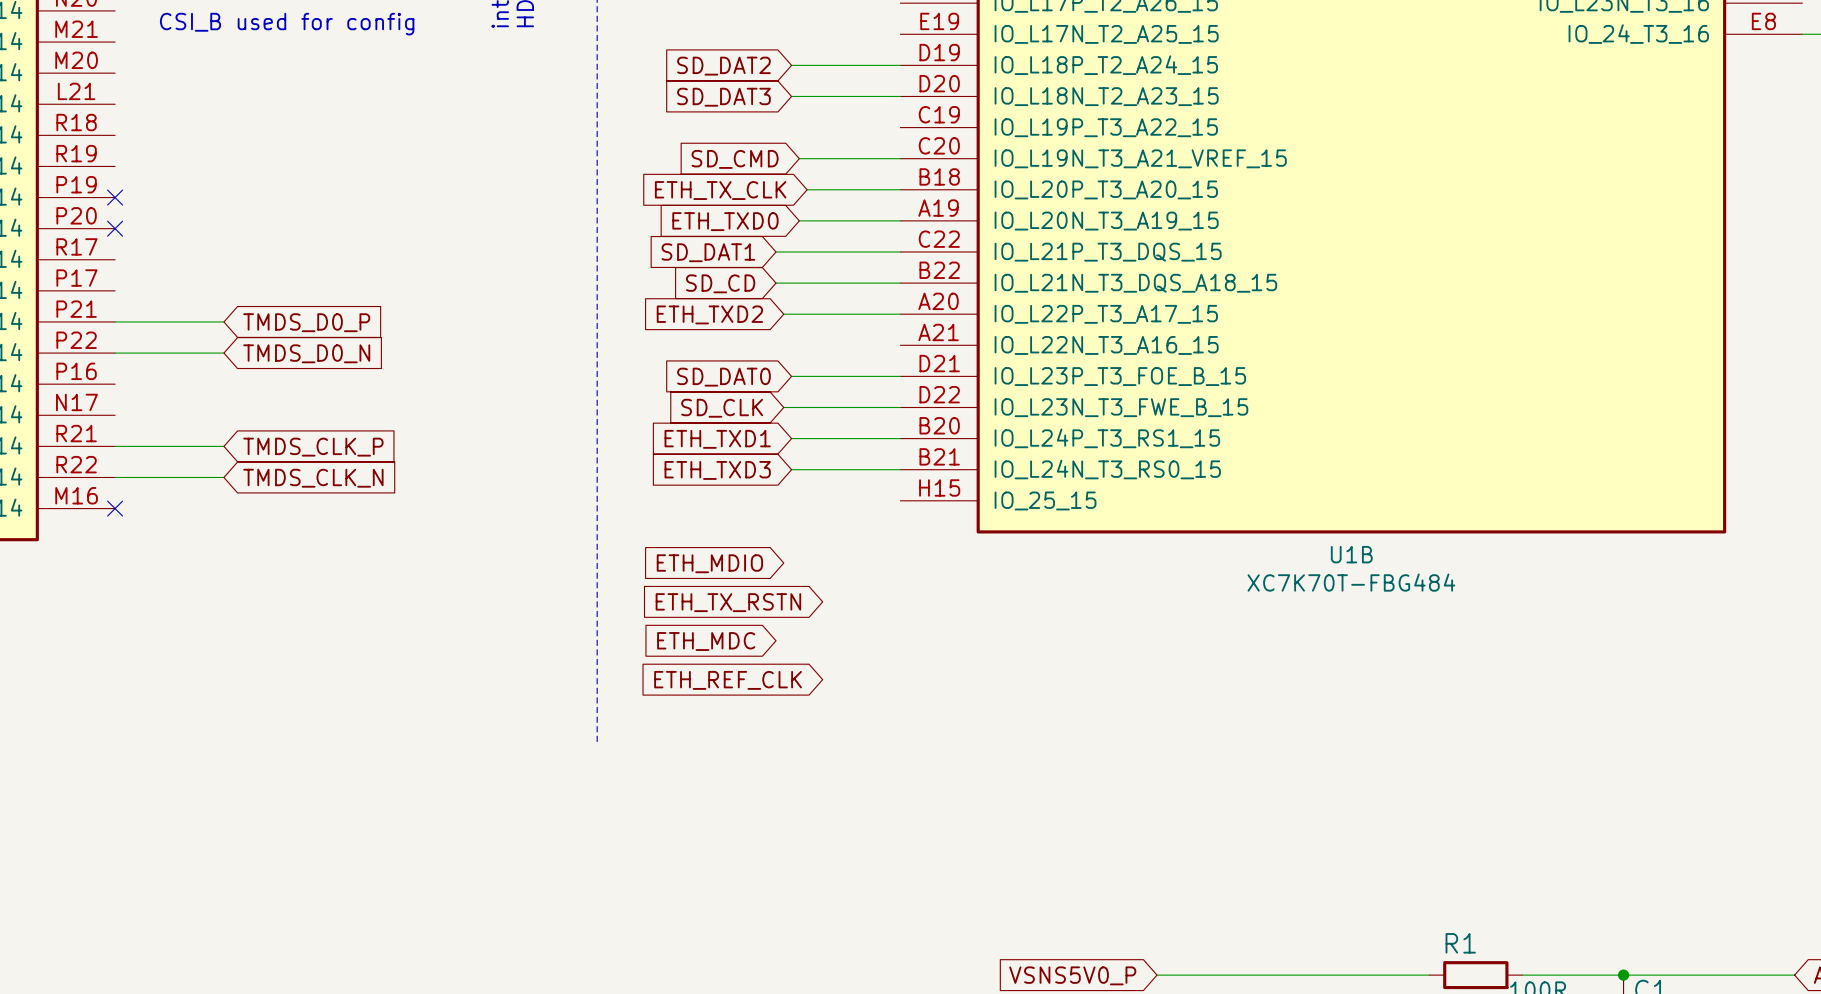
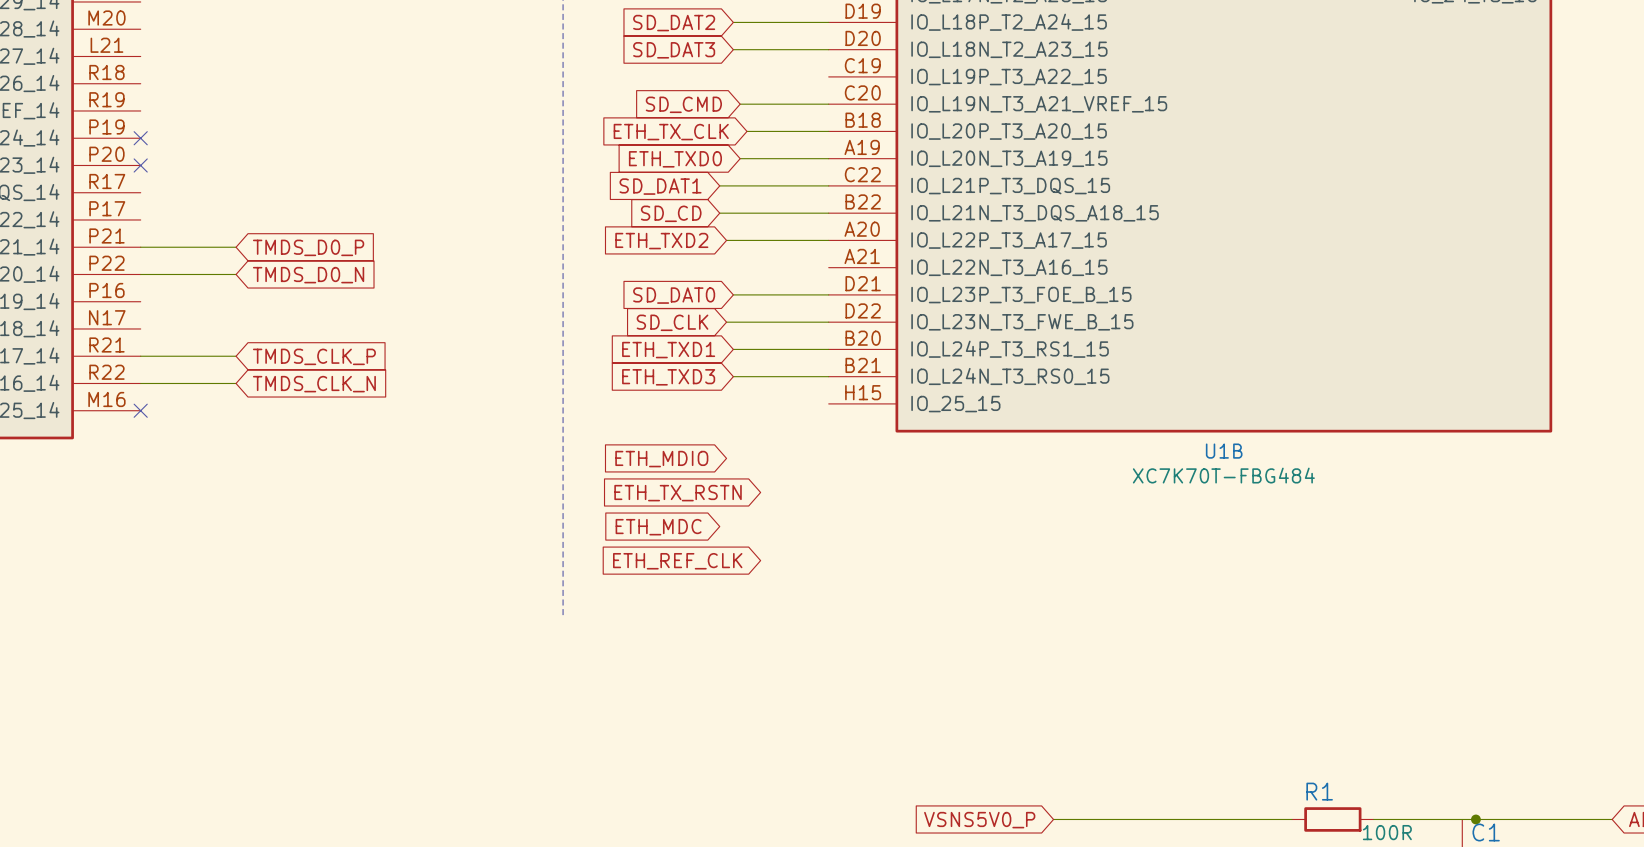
junction position: (1623, 975) -> (1475, 819)

